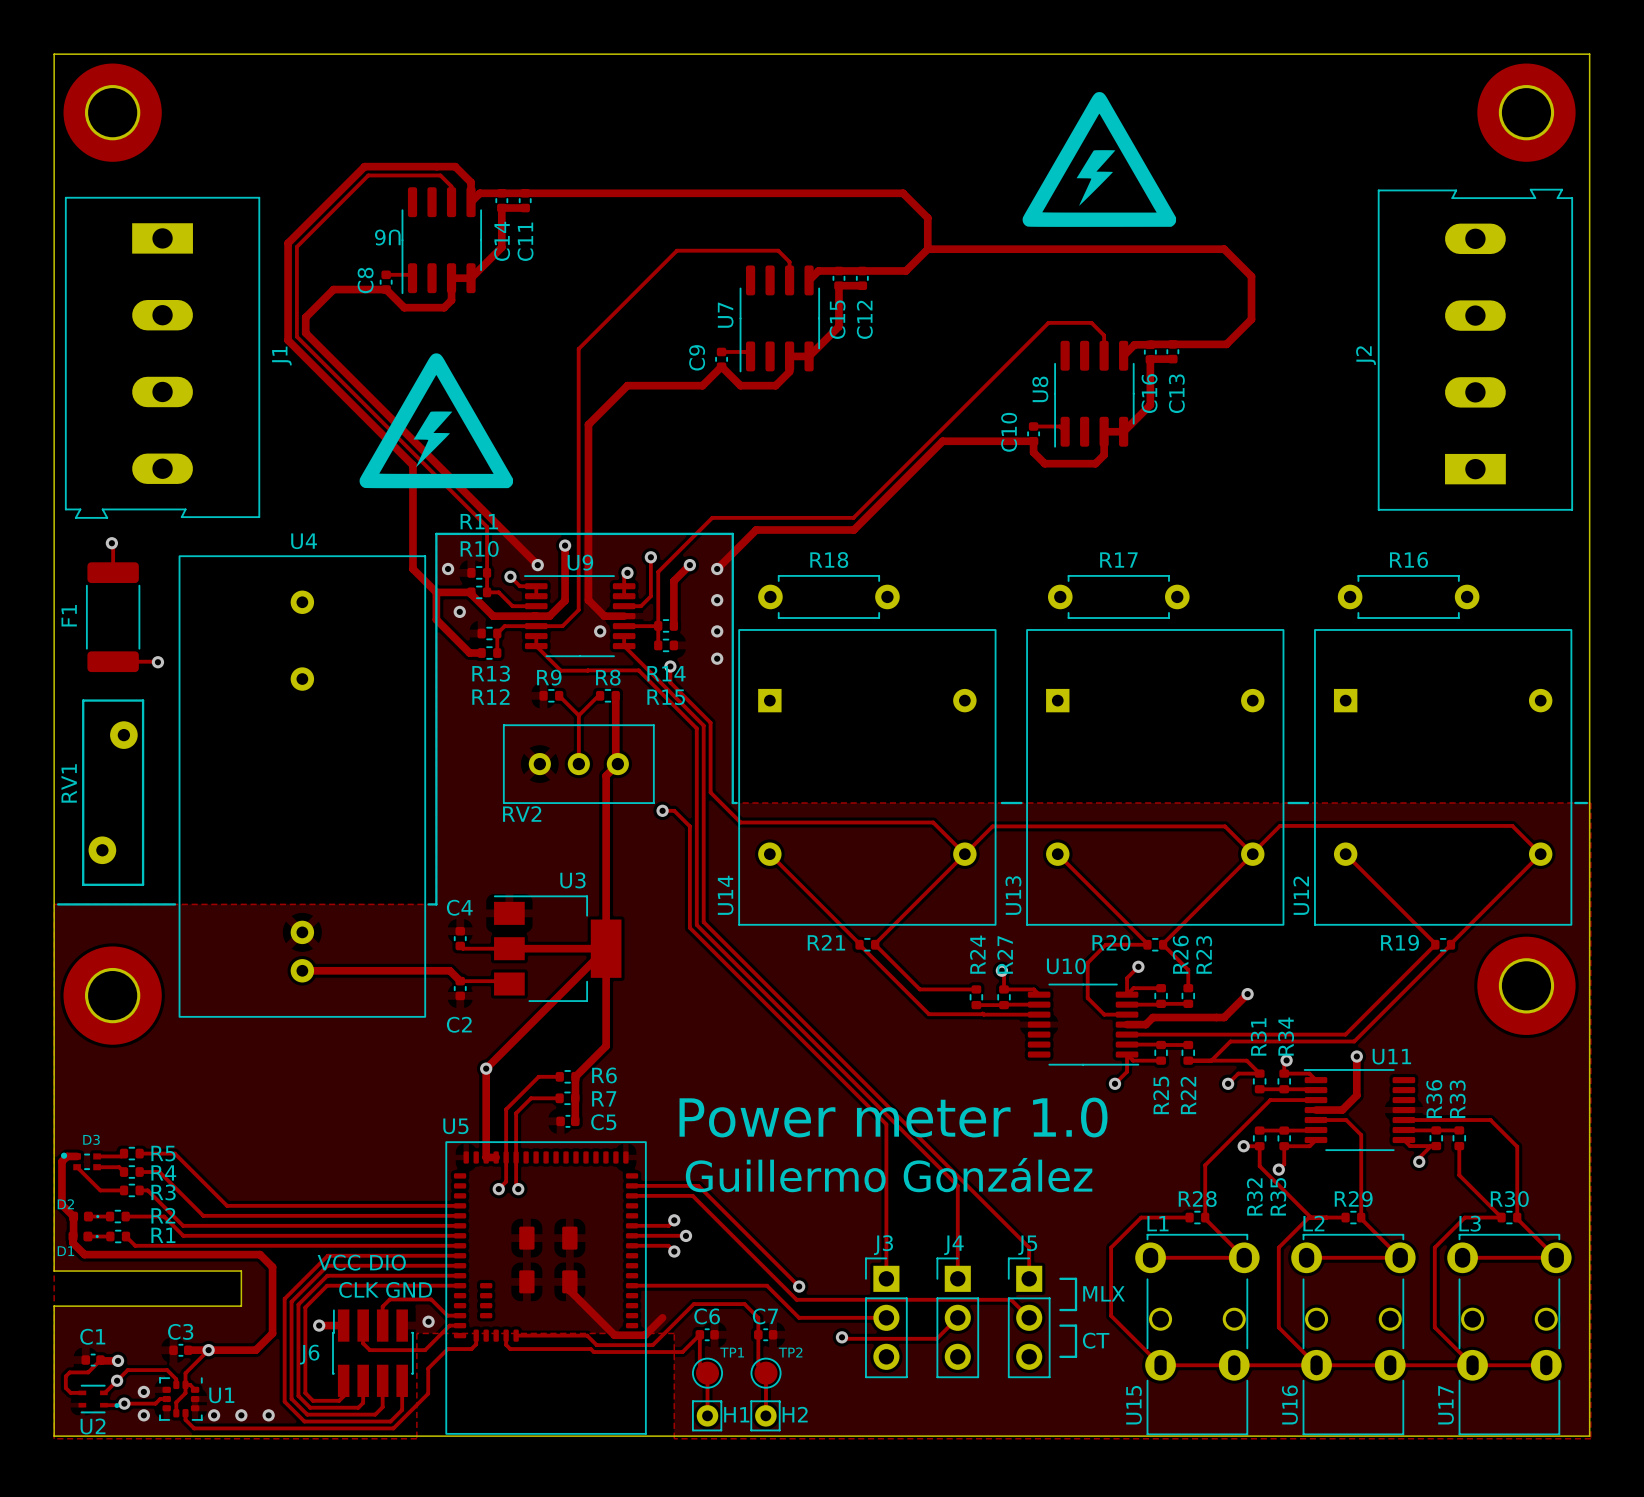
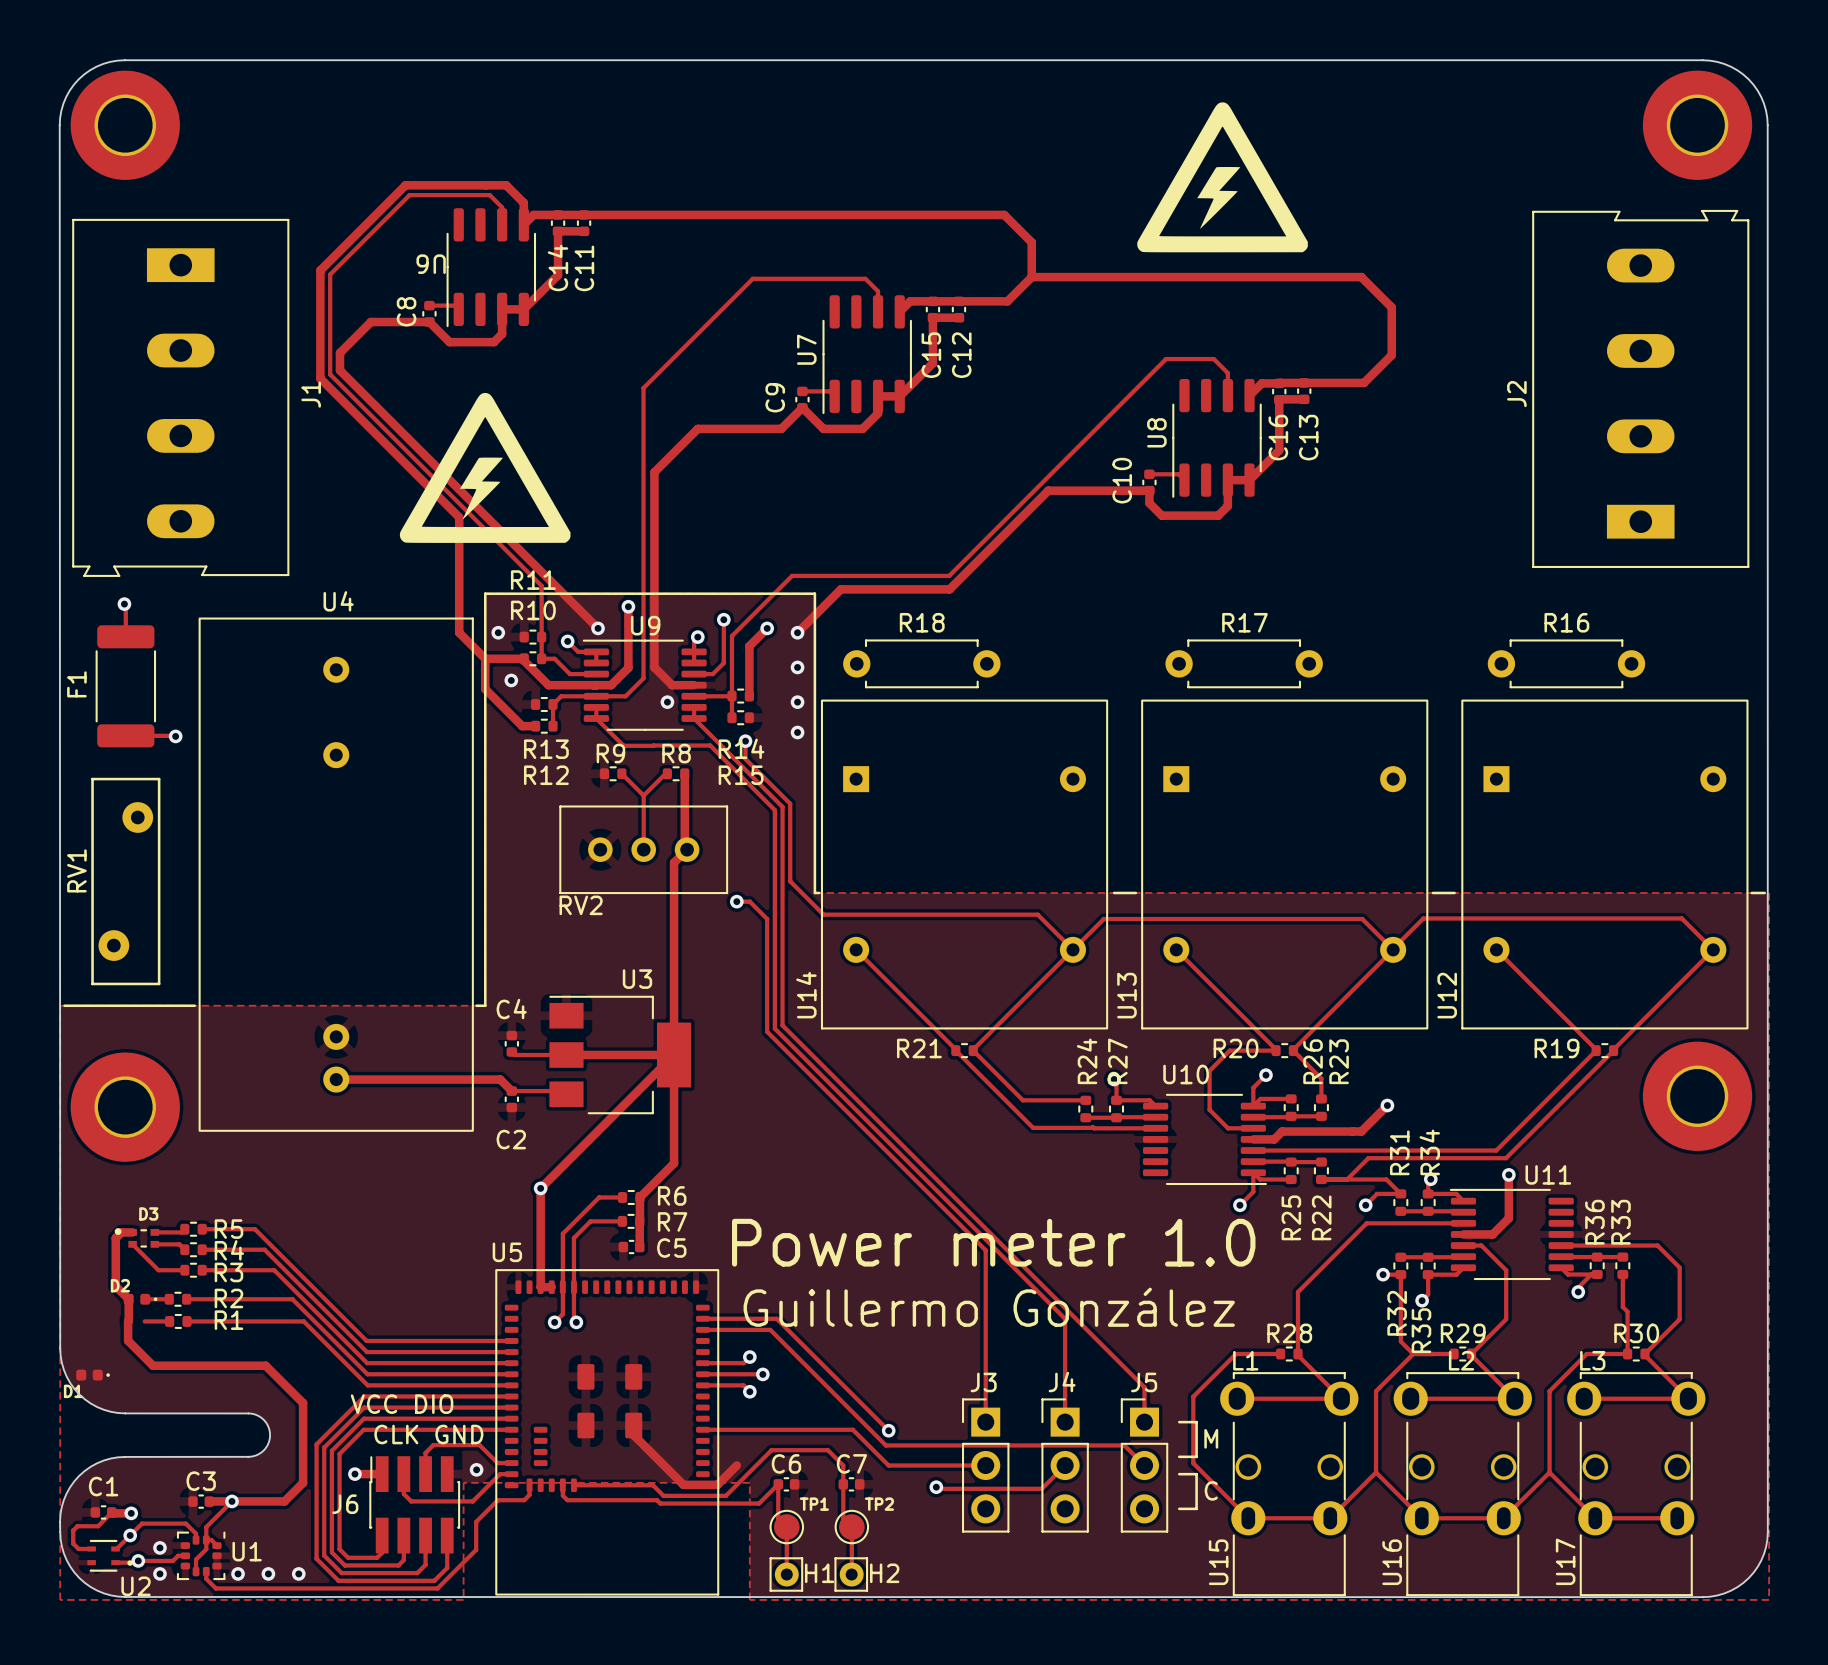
board edge: (112, 54) (54, 54) (54, 1271) (241, 1271) (241, 1306) (54, 1306) (54, 1436) (1589, 1436) (1589, 54) (1531, 54) -> (124, 60) (103, 63) (90, 70) (78, 79) (69, 90) (63, 103) (59, 125) (60, 1355) (63, 1369) (74, 1388) (84, 1399) (103, 1409) (125, 1413) (251, 1413) (264, 1420) (270, 1435) (264, 1449) (253, 1456) (117, 1457) (103, 1460) (84, 1471) (74, 1481) (66, 1493) (61, 1507) (60, 1521) (60, 1539) (63, 1553) (70, 1566) (79, 1577) (90, 1587) (103, 1593) (125, 1596) (1702, 1597) (1724, 1593) (1737, 1587) (1748, 1578) (1757, 1566) (1764, 1553) (1767, 1532) (1767, 125) (1764, 103) (1757, 90) (1748, 79) (1737, 70) (1724, 63) (1702, 60)
track: (1270, 1100) (1205, 1165) (1205, 1218) (1244, 1257) (1206, 1257) -> (1412, 1223) (1366, 1223) (1298, 1292) (1298, 1355) (1341, 1398)
track: (1332, 1120) (1346, 1120) (1361, 1135) (1361, 1218) (1400, 1257) (1362, 1257) -> (1481, 1245) (1506, 1270) (1506, 1319) (1471, 1355) (1514, 1398)
track: (1510, 1139) (1517, 1146) (1517, 1218) (1556, 1257) (1518, 1257) -> (1679, 1267) (1679, 1319) (1644, 1355) (1688, 1398)
track: (124, 1153) (121, 1156) (97, 1156) -> (184, 1229) (181, 1232) (154, 1232)
R5 position: (131, 1153) -> (193, 1229)
track: (139, 1153) (174, 1153) (227, 1205) (329, 1205) -> (202, 1229) (255, 1229) (366, 1340)
track: (77, 1156) (67, 1156) (61, 1161) (61, 1204) (73, 1216) (73, 1243) (84, 1254) (260, 1254) (272, 1267) -> (132, 1232) (121, 1232) (115, 1238) (115, 1286) (128, 1299) (128, 1340) (152, 1365) (265, 1365) (303, 1403) (303, 1409)
D3 position: (80, 1161) -> (136, 1237)
track: (1259, 1166) (1311, 1217) -> (1400, 1296) (1400, 1341) (1413, 1354)
track: (77, 1167) (100, 1190) (124, 1190) -> (132, 1244) (158, 1270) (184, 1270)
track: (97, 1167) (119, 1167) (124, 1172) -> (154, 1244) (179, 1244) (184, 1249)
R4 position: (131, 1172) -> (193, 1249)
track: (139, 1172) (159, 1172) (203, 1215) (330, 1215) -> (202, 1249) (264, 1249) (367, 1352)
track: (1463, 1179) (1501, 1217) (1464, 1217) (1434, 1247) (1434, 1327) (1472, 1365) -> (1627, 1311) (1627, 1354) (1586, 1354) (1549, 1391) (1549, 1474)
R3 position: (131, 1190) -> (193, 1270)
track: (139, 1190) (147, 1190) (183, 1225) (330, 1225) -> (202, 1270) (274, 1270) (367, 1363)
R32 name position: R32 (1254, 1196) -> R32 (1397, 1313)
D2 position: (84, 1216) -> (140, 1299)
track: (88, 1216) (110, 1216) -> (145, 1299) (169, 1299)
R2 position: (117, 1216) -> (177, 1299)
track: (125, 1216) (164, 1216) (183, 1235) (330, 1235) -> (186, 1299) (292, 1299) (367, 1374)
track: (1141, 1217) (1111, 1247) (1111, 1315) (1160, 1365) -> (1269, 1354) (1236, 1354) (1193, 1396) (1193, 1463) (1248, 1518) (1290, 1518)
track: (1151, 1217) (1189, 1217) -> (1237, 1398) (1279, 1398)
R28 position: (1197, 1217) -> (1289, 1354)
track: none -> (1413, 1354) (1454, 1354)
track: none -> (1413, 1354) (1376, 1391) (1376, 1472) (1421, 1518)
track: (1345, 1217) (1308, 1217) (1278, 1247) (1278, 1327) (1316, 1365) -> none
R29 position: (1353, 1217) -> (1462, 1354)
R30 position: (1509, 1217) -> (1636, 1354)
text position: L1 (1157, 1223) -> L1 (1245, 1360)
text position: L3 (1470, 1223) -> L3 (1592, 1360)
track: (87, 1236) (110, 1236) -> (144, 1321) (169, 1321)
R1 position: (118, 1236) -> (178, 1321)
track: (126, 1236) (135, 1245) (330, 1245) -> (187, 1321) (303, 1321) (367, 1385)
track: none -> (1410, 1398) (1452, 1398)
text: MLX (1104, 1293) -> M (1211, 1438)
track: none -> (1549, 1472) (1595, 1518)
U15 position: (1197, 1334) -> (1289, 1484)
U16 position: (1353, 1334) -> (1462, 1484)
U17 position: (1509, 1334) -> (1636, 1484)
text: CT (1096, 1340) -> C (1211, 1490)
track: (1196, 1365) (1278, 1365) -> (1330, 1518) (1376, 1472)
track: (1352, 1365) (1434, 1365) -> (1503, 1518) (1549, 1472)
track: (1508, 1365) (1546, 1365) -> (1584, 1398) (1626, 1398)
U2 name position: U2 (93, 1426) -> U2 (136, 1586)

